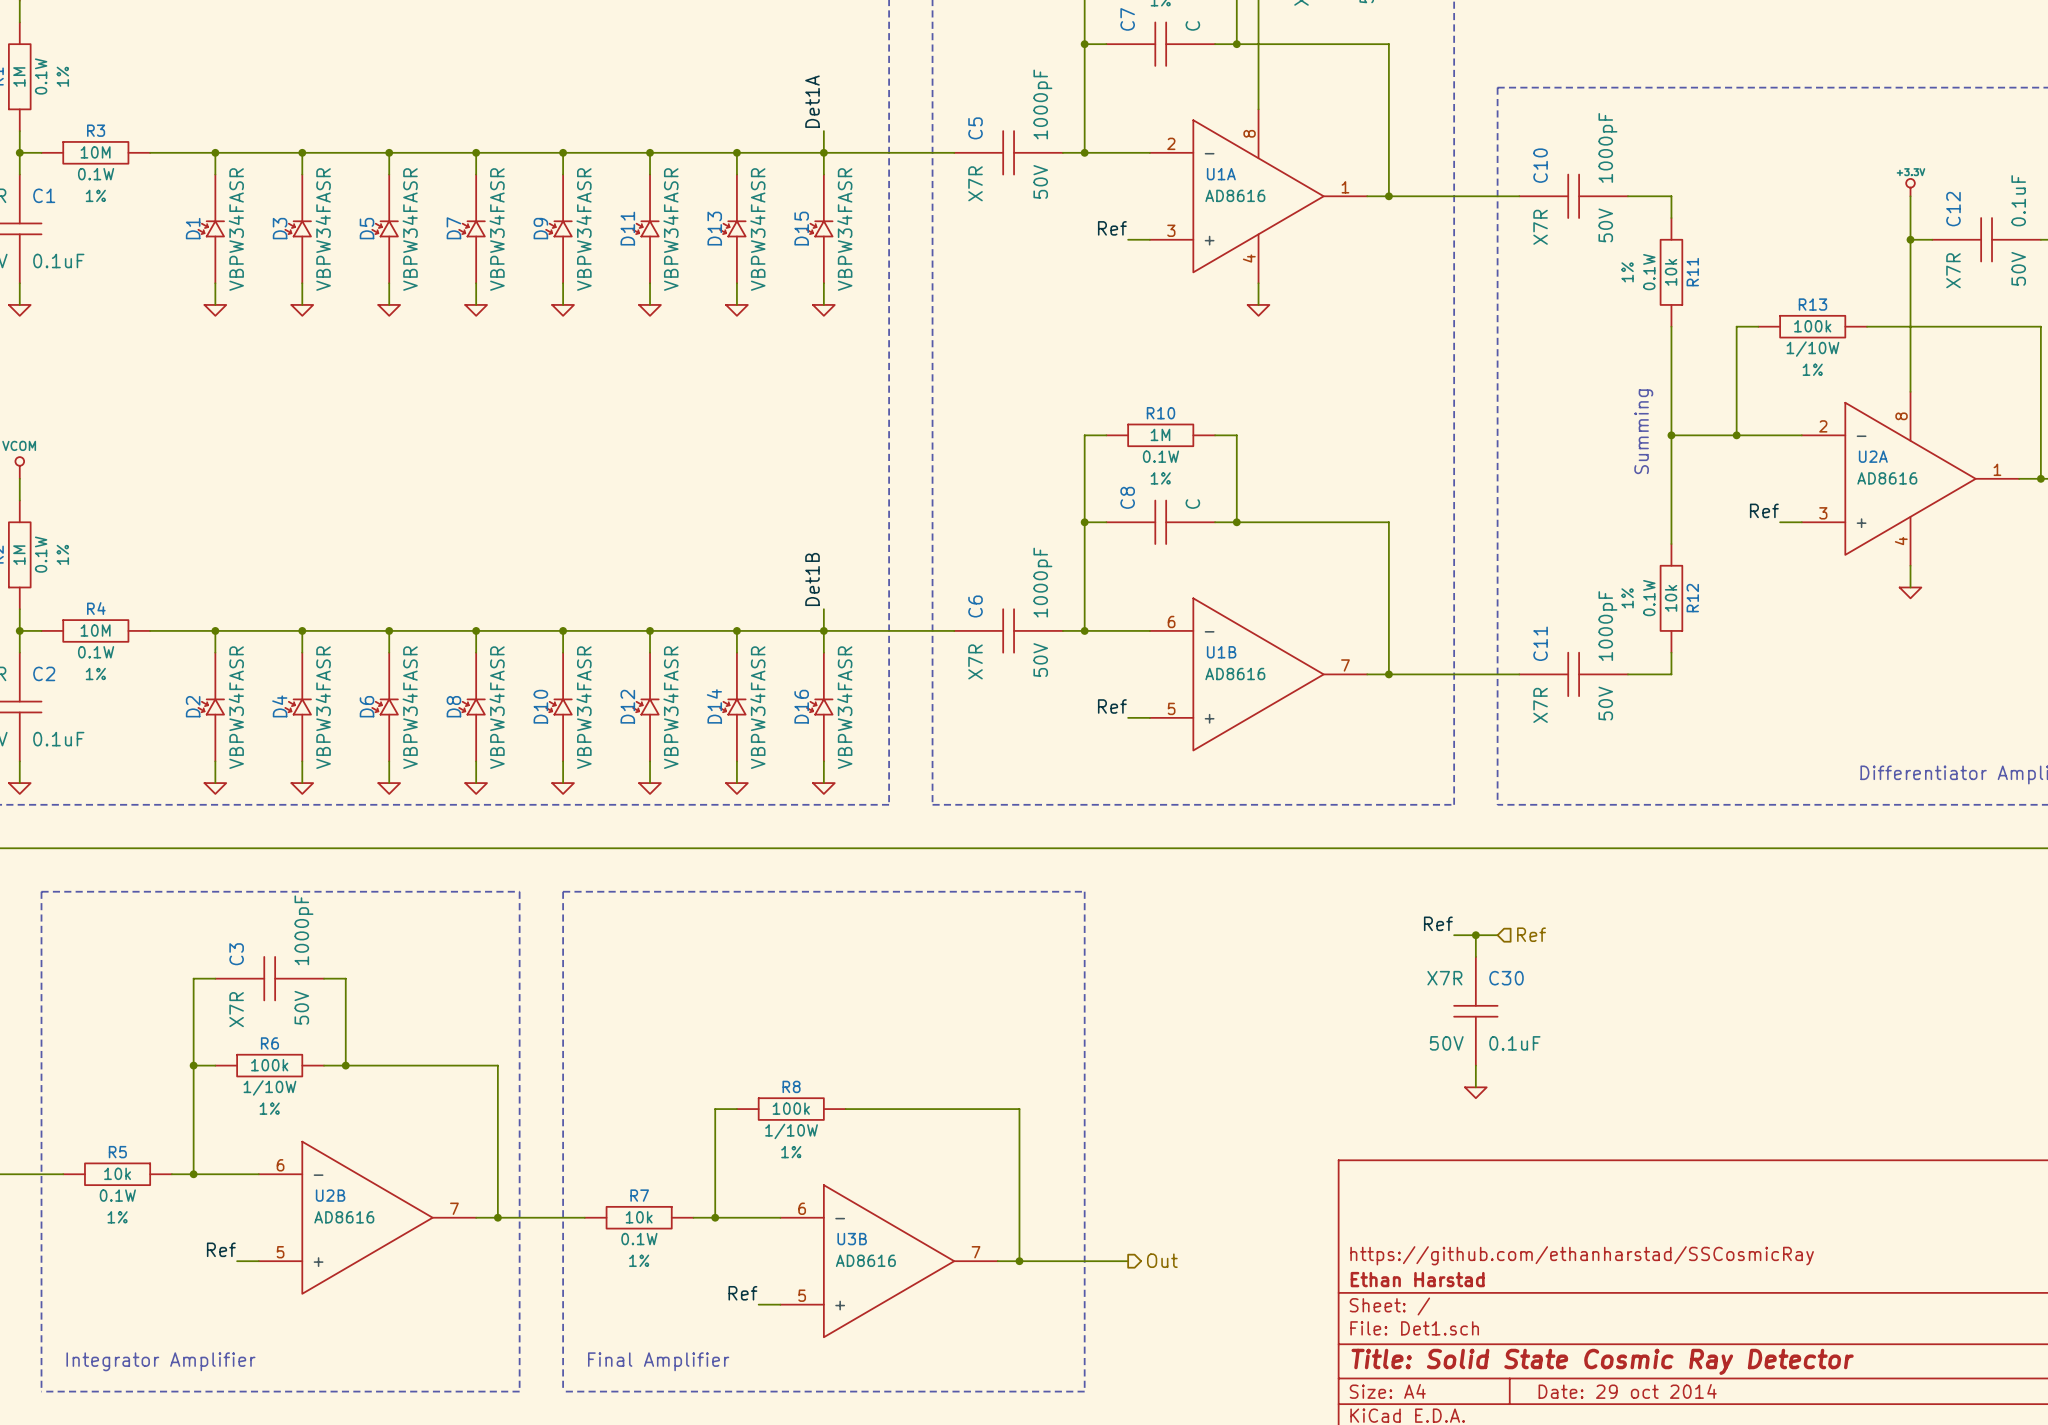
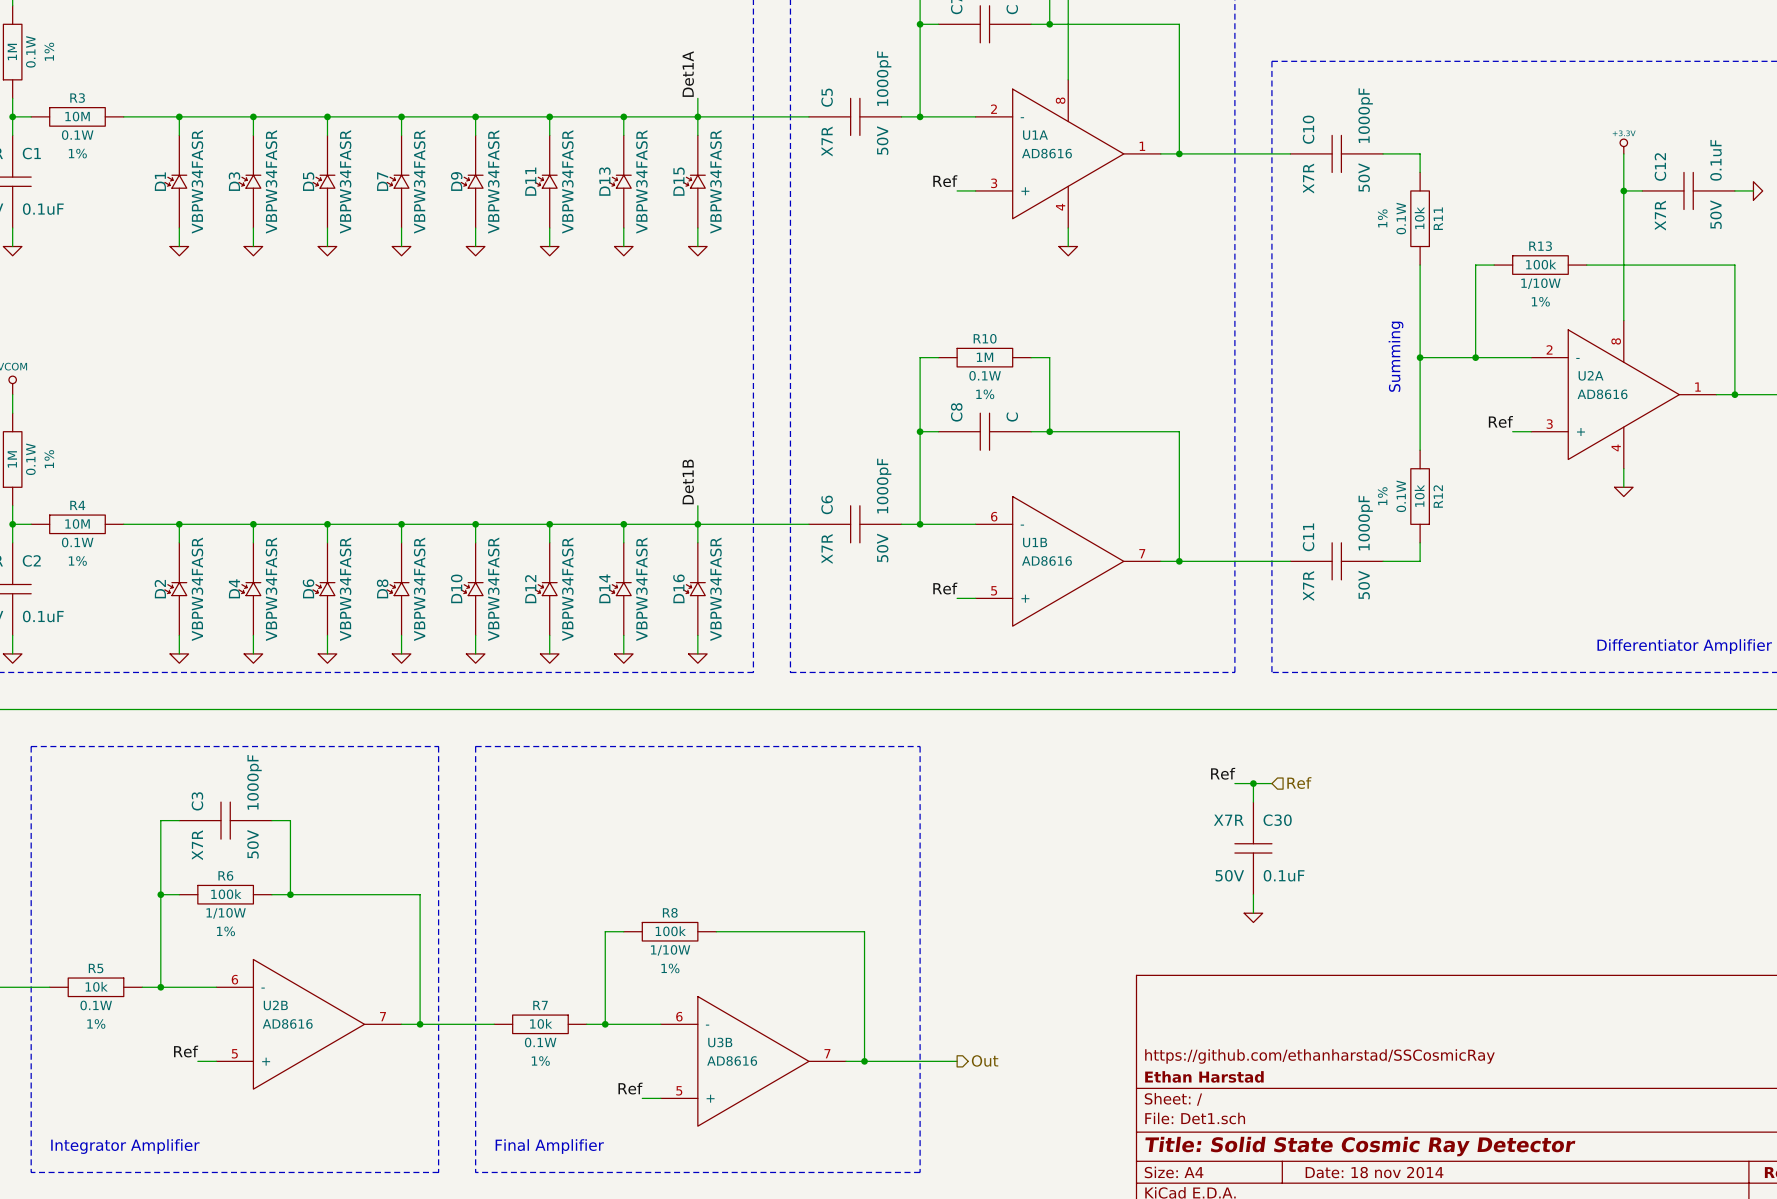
title block: Date: 29 oct 2014 (1627, 1391) -> Date: 18 nov 2014 (1374, 1172)

